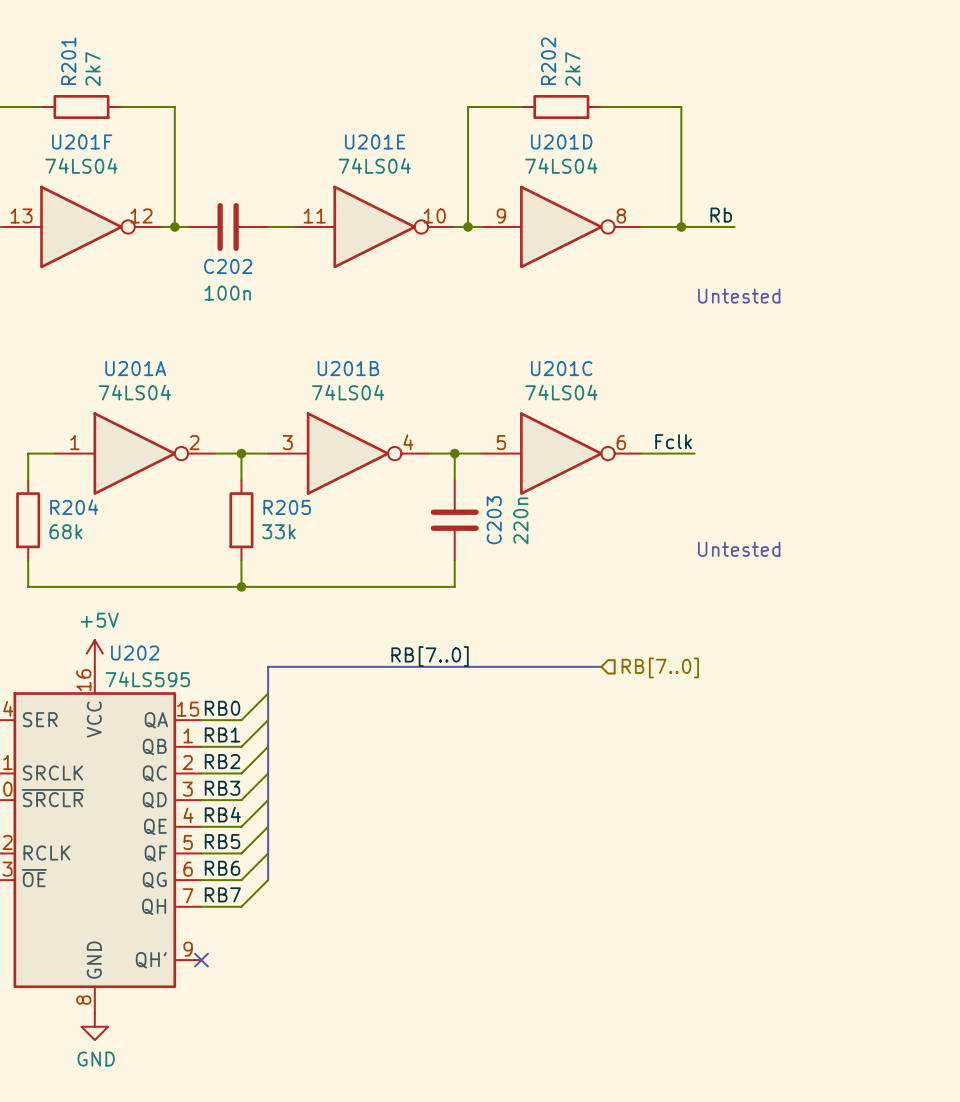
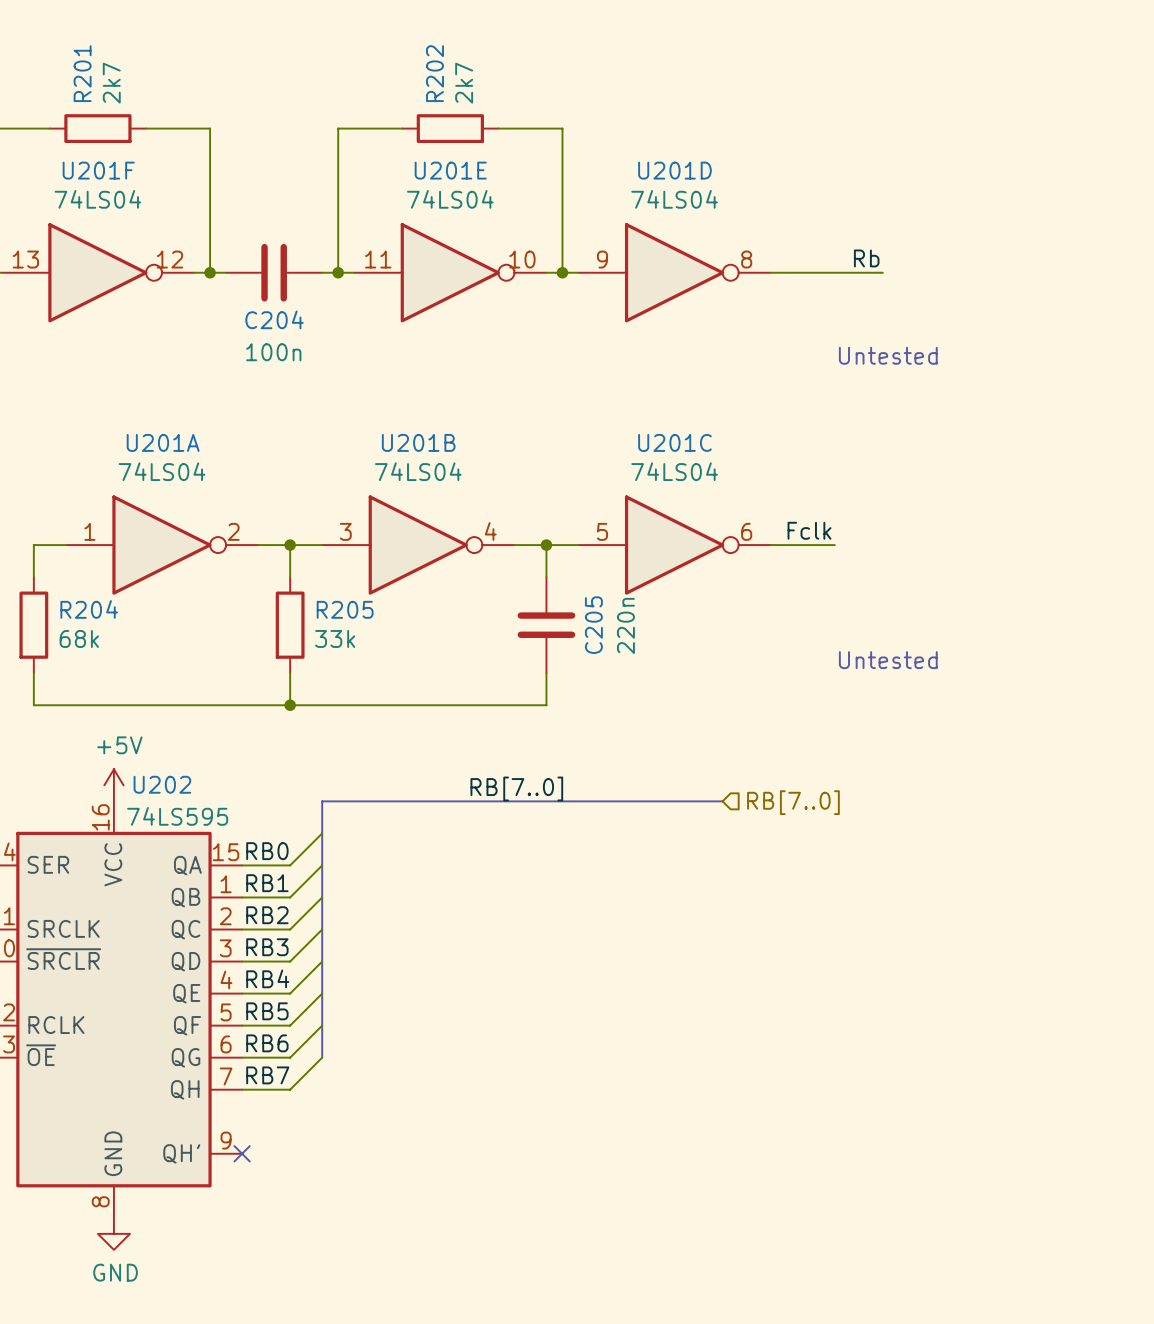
wire: none -> (402, 128) (338, 128) (338, 272)
wire: (468, 107) (521, 107) -> (562, 128) (498, 128)
R202 position: (561, 107) -> (450, 128)
wire: (601, 107) (681, 107) (681, 226) -> none
junction: none -> (338, 272)
junction: (681, 226) -> none
C202 name: C202 (228, 266) -> C204 (274, 319)
C203 name: C203 (494, 520) -> C205 (593, 625)

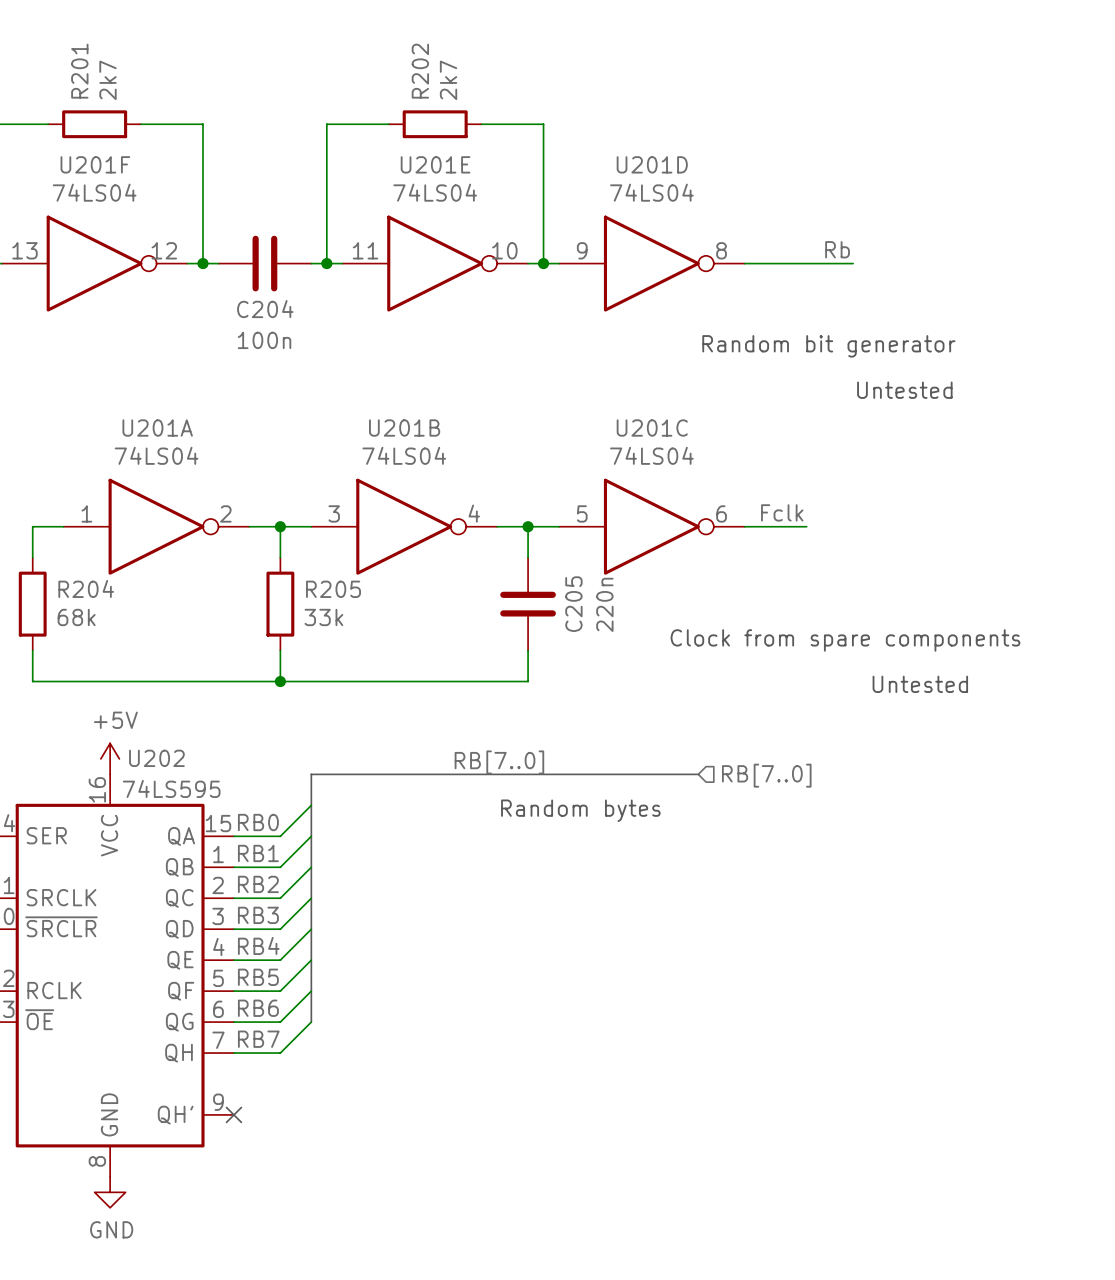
text position: Untested (888, 355) -> Untested (904, 390)
text: none -> Random bit generator (828, 346)
text position: Untested (888, 660) -> Untested (920, 684)
text: none -> Clock from spare components (845, 640)
text: none -> Random bytes (580, 810)

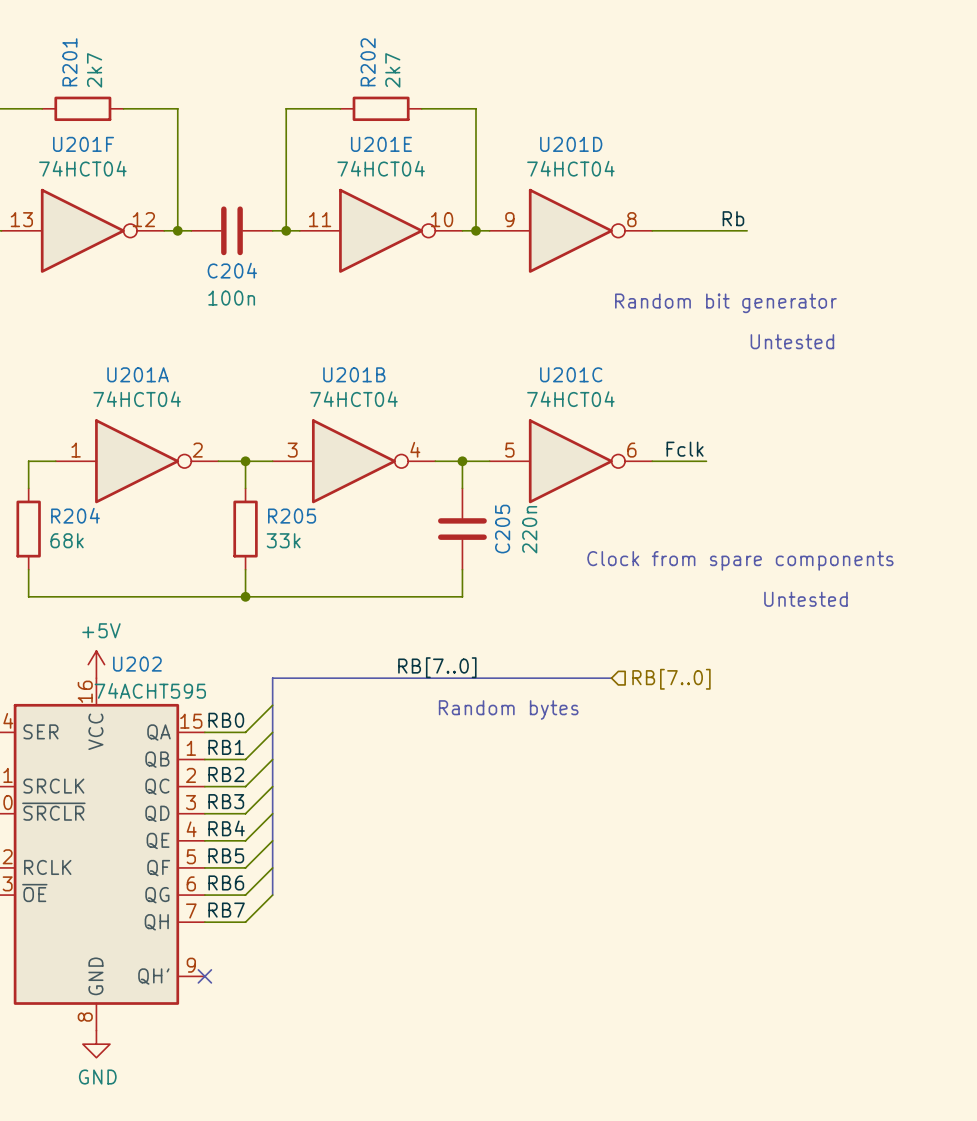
U201F value: 74LS04 (94, 192) -> 74HCT04 (82, 168)
U201E value: 74LS04 (435, 192) -> 74HCT04 (381, 168)
U201D value: 74LS04 (651, 192) -> 74HCT04 (570, 168)
U201A value: 74LS04 (156, 455) -> 74HCT04 (137, 399)
U201B value: 74LS04 (404, 455) -> 74HCT04 (353, 399)
U201C value: 74LS04 (651, 455) -> 74HCT04 (570, 399)
U202 value: 74LS595 (171, 788) -> 74ACHT595 (150, 690)

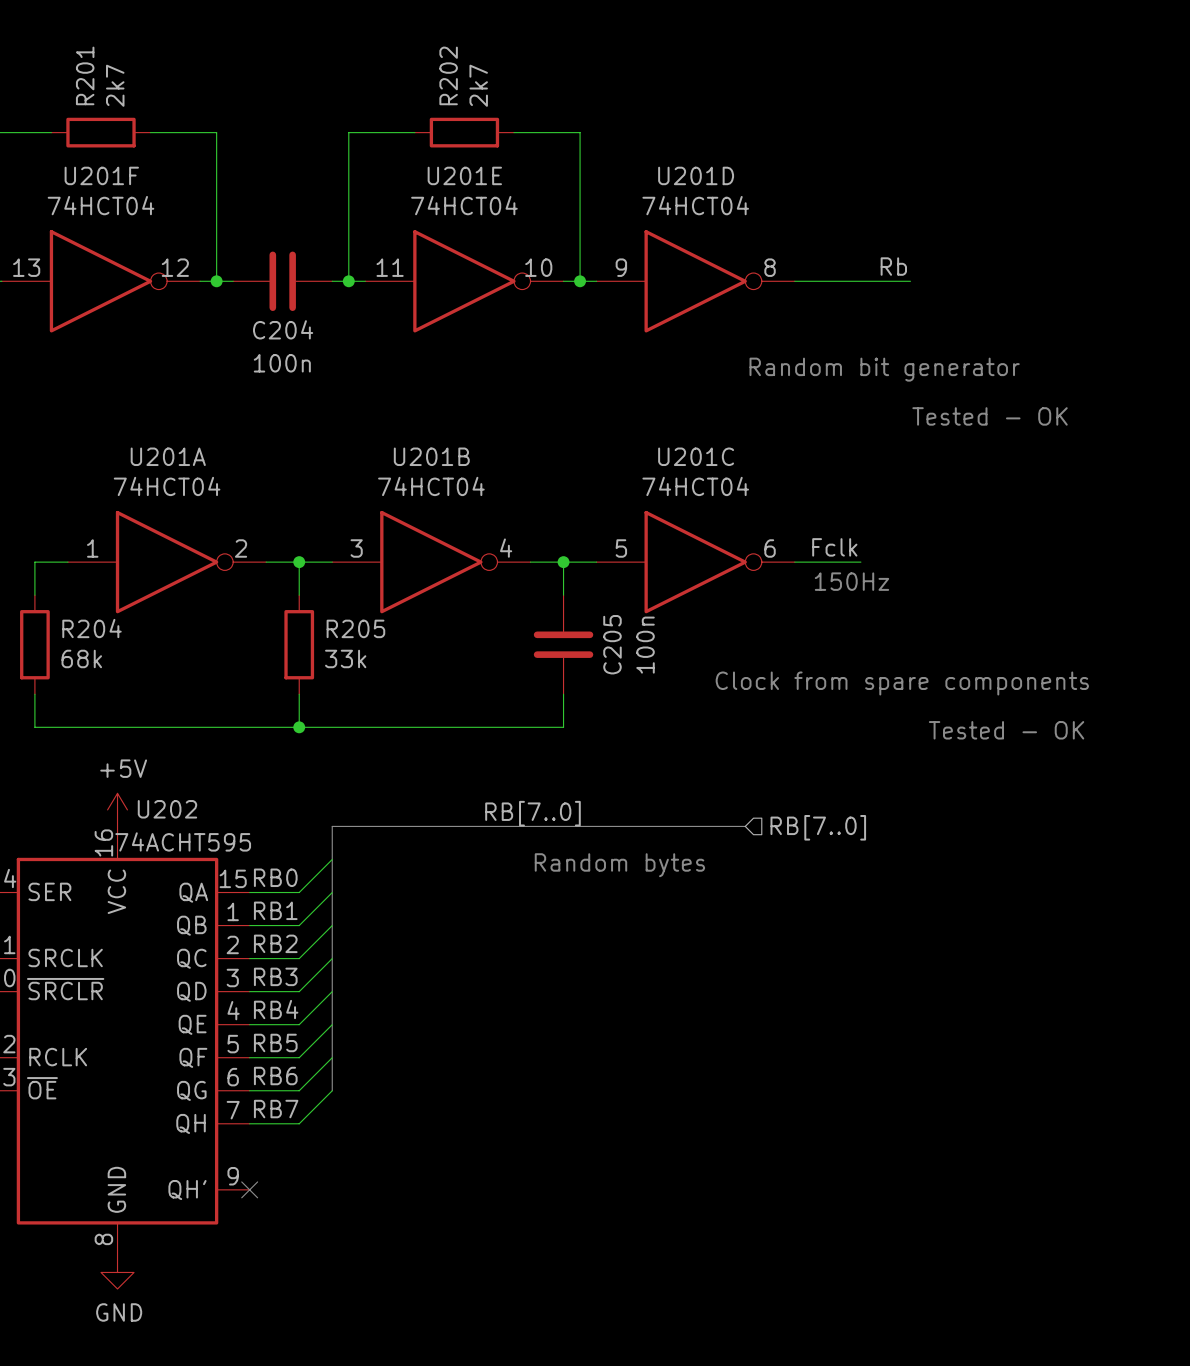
text: Untested (792, 341) -> Tested - OK (990, 416)
text: none -> 150Hz (851, 581)
C205 value: 220n (529, 529) -> 100n (645, 645)
text: Untested (805, 599) -> Tested - OK (1006, 730)

